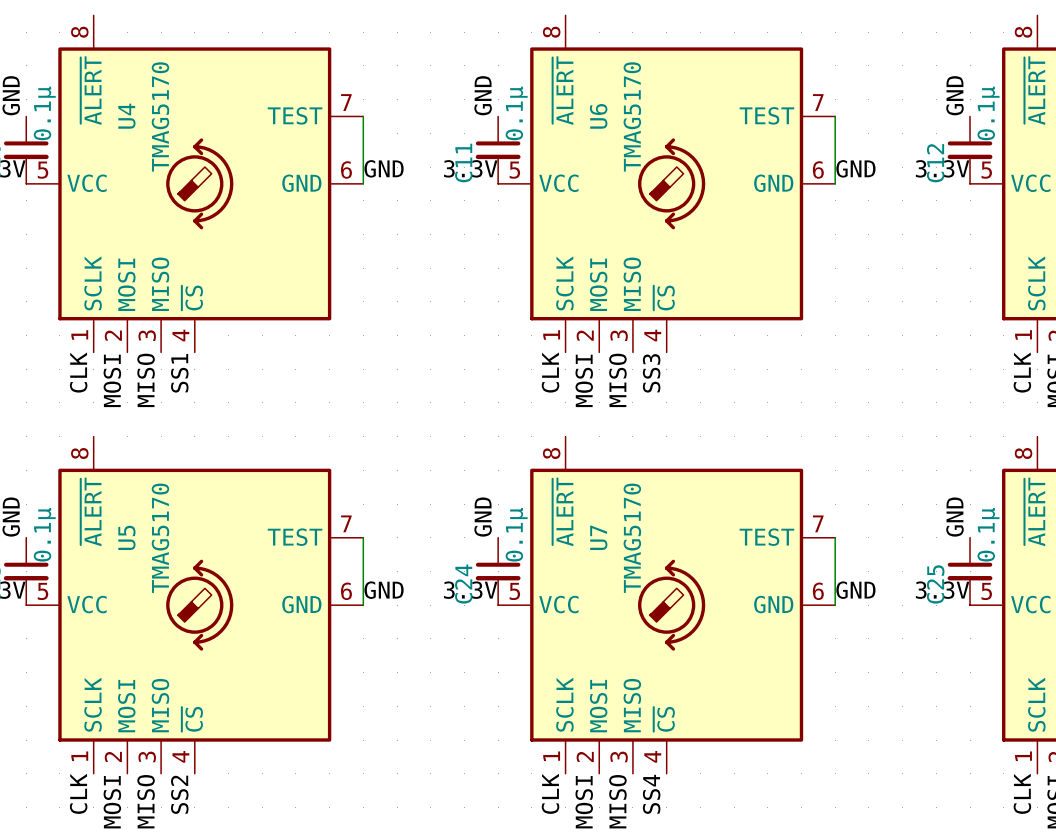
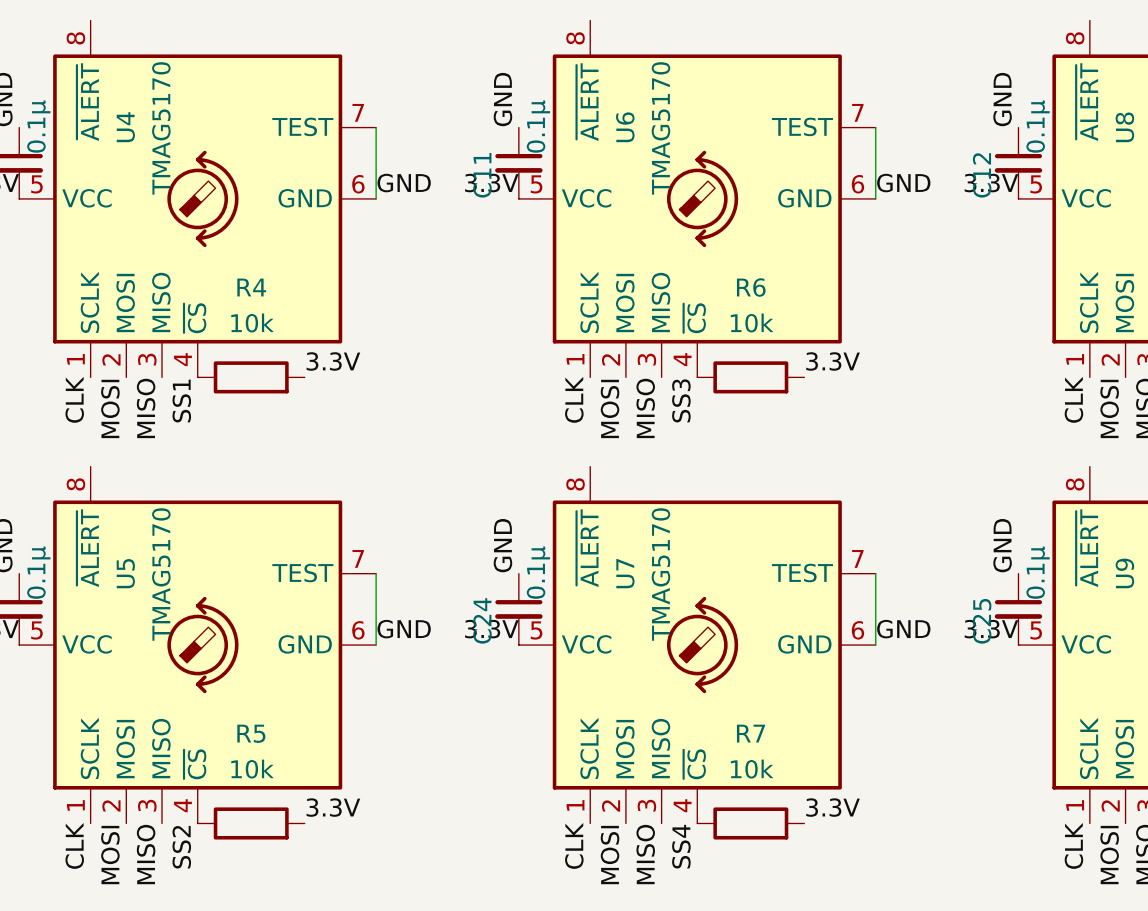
label: none -> 3.3V (333, 361)
label: none -> 3.3V (833, 361)
R4: none -> 10k (251, 377)
R6: none -> 10k (750, 377)
label: none -> 3.3V (333, 807)
label: none -> 3.3V (833, 807)
R5: none -> 10k (251, 823)
R7: none -> 10k (750, 823)

